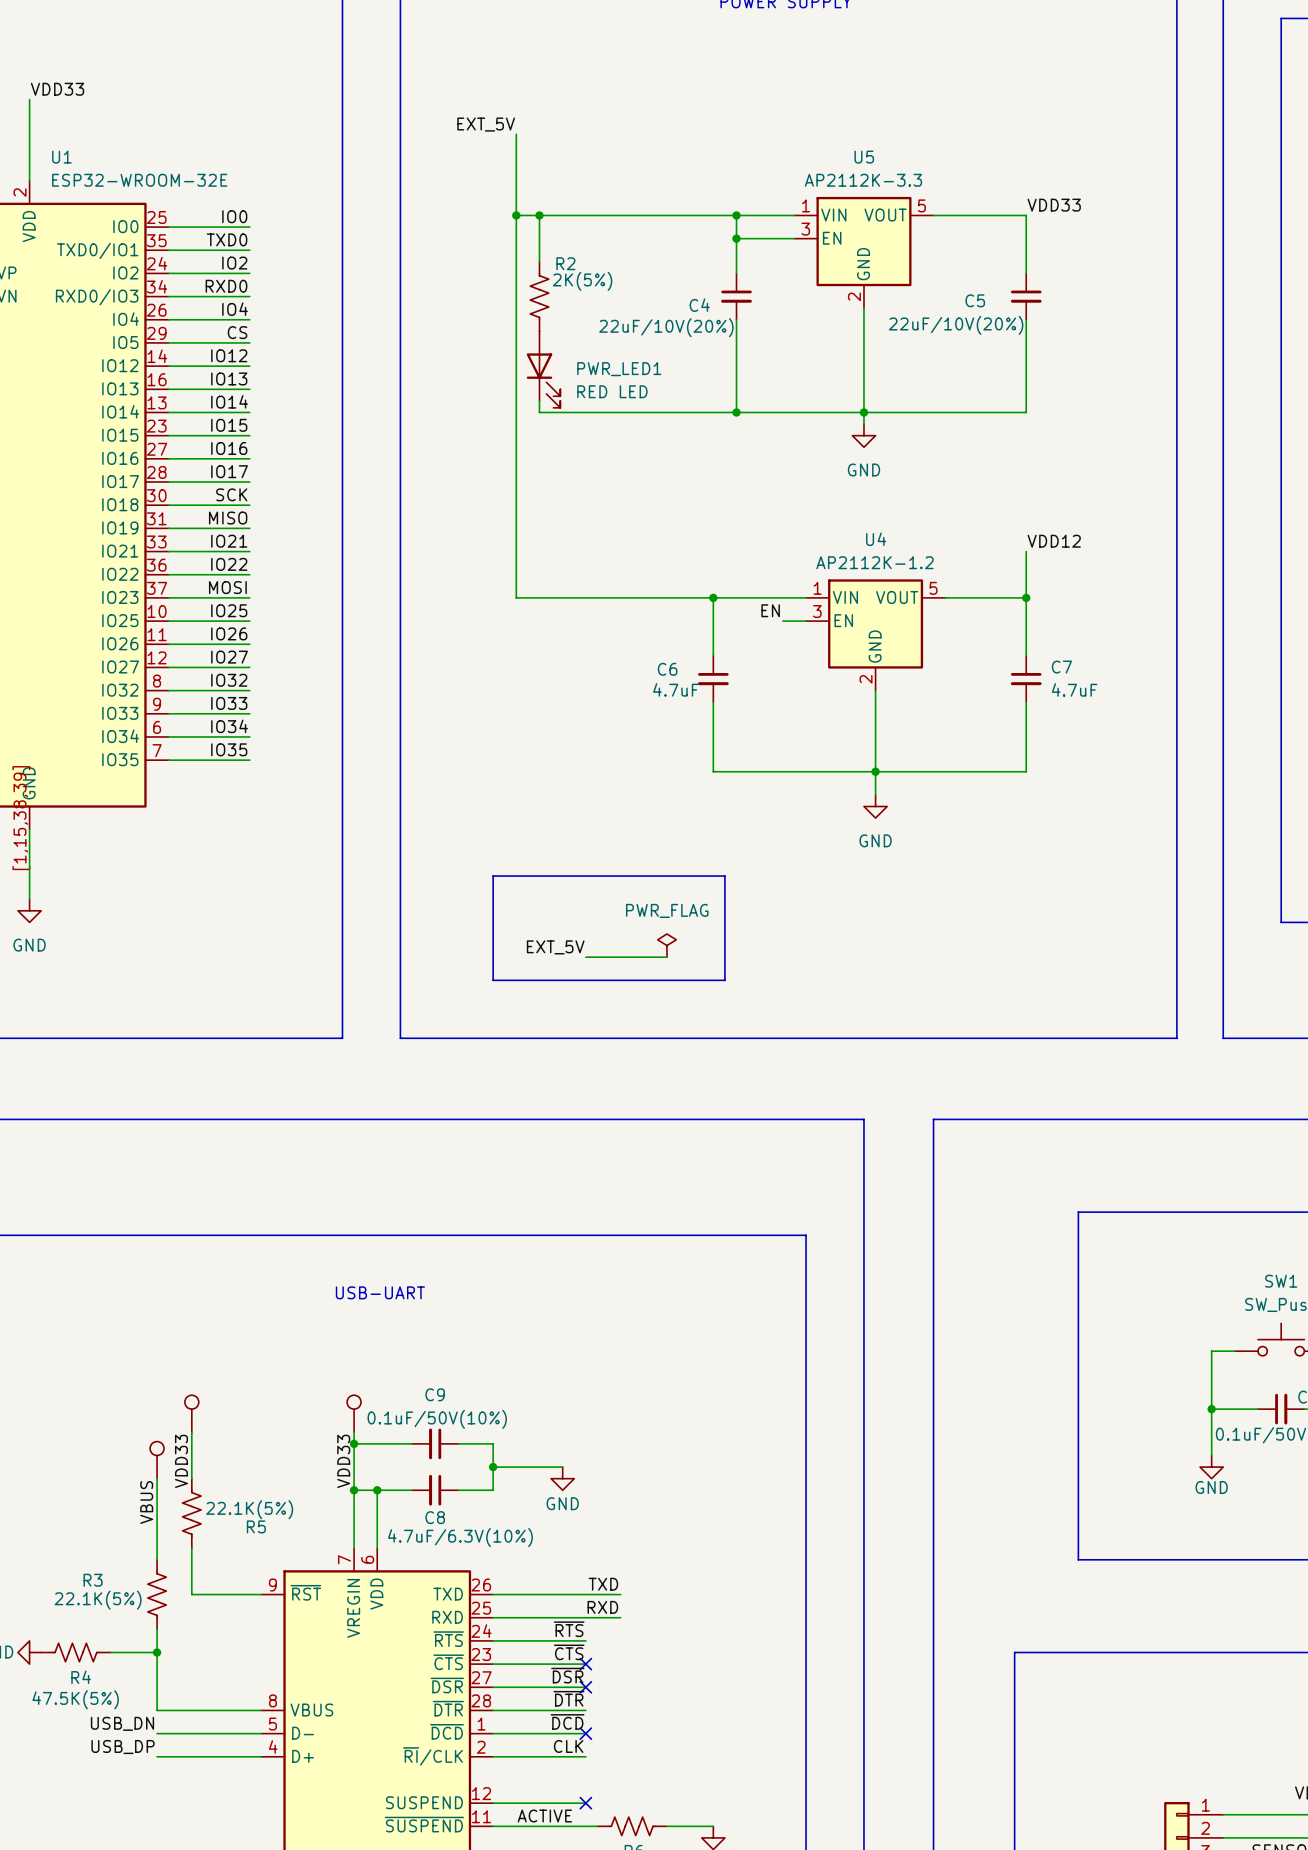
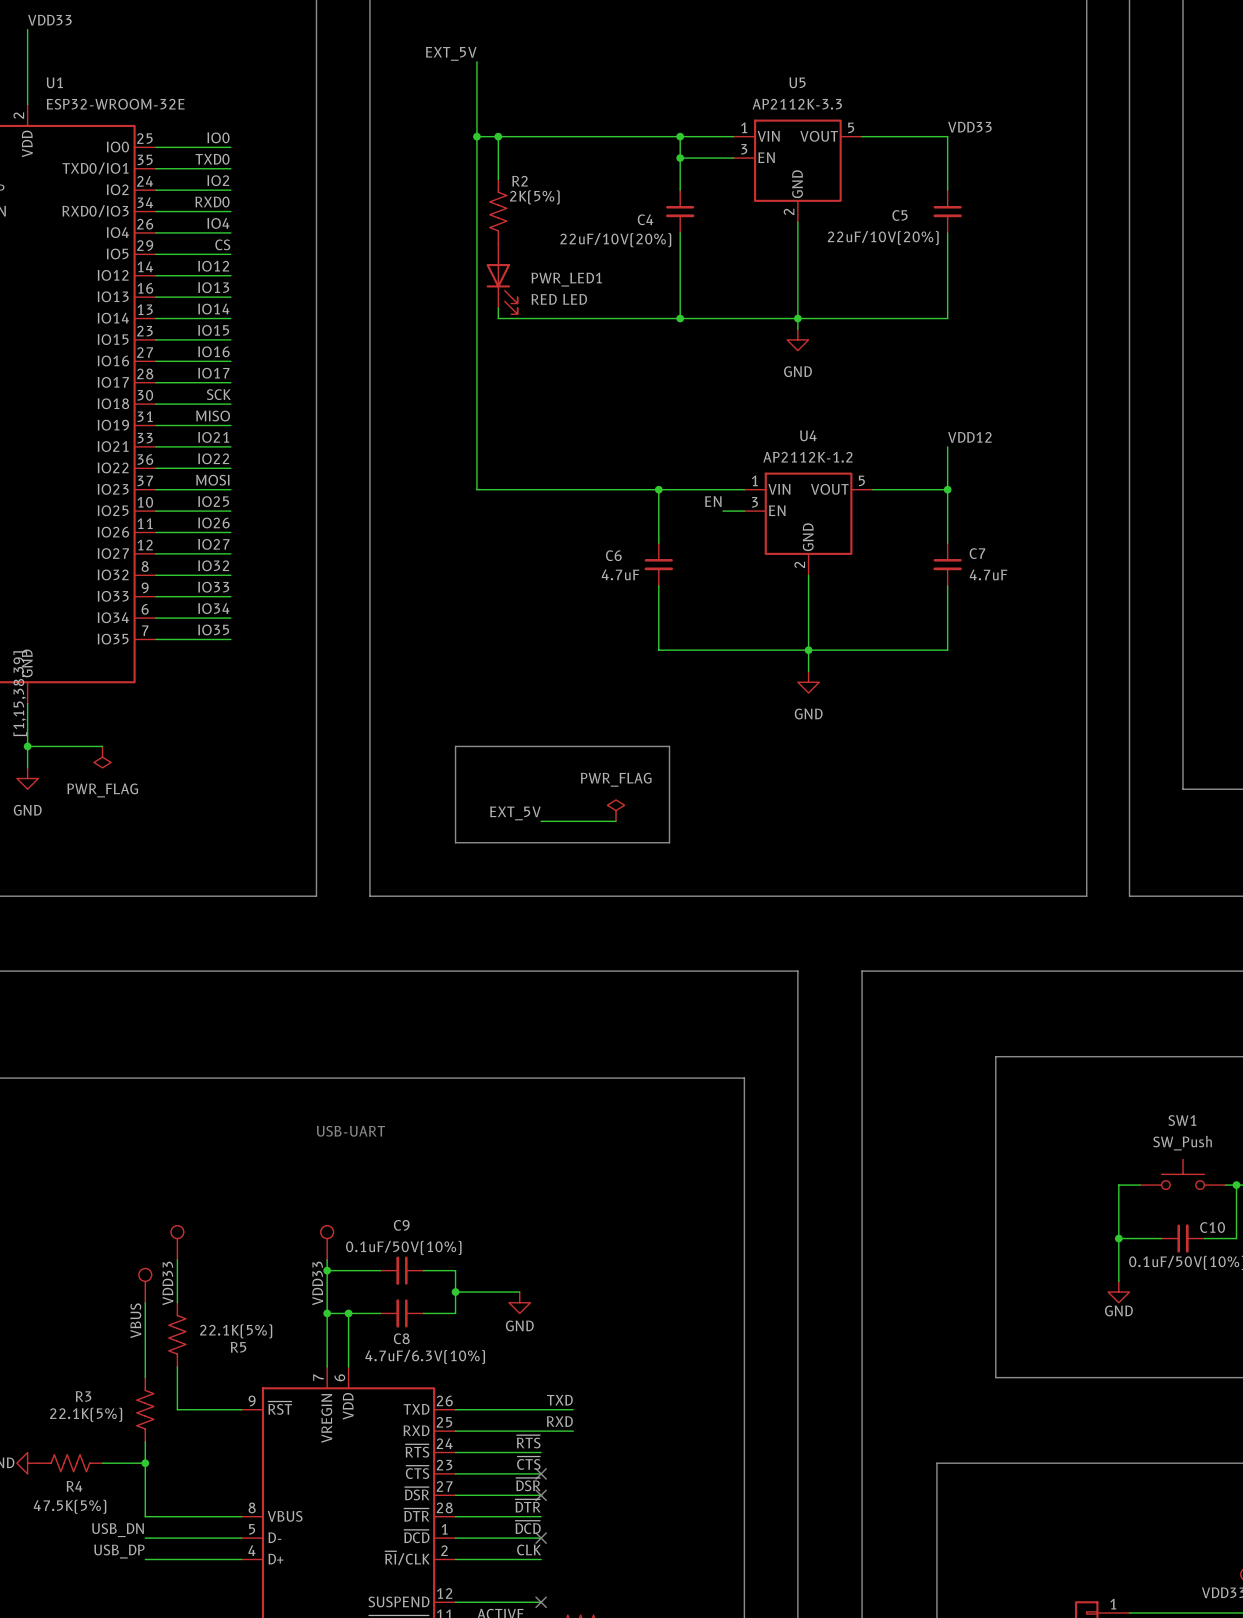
wire: none -> (27, 746) (102, 746)
junction: none -> (27, 746)
power symbol: none -> PWR_FLAG (102, 757)

